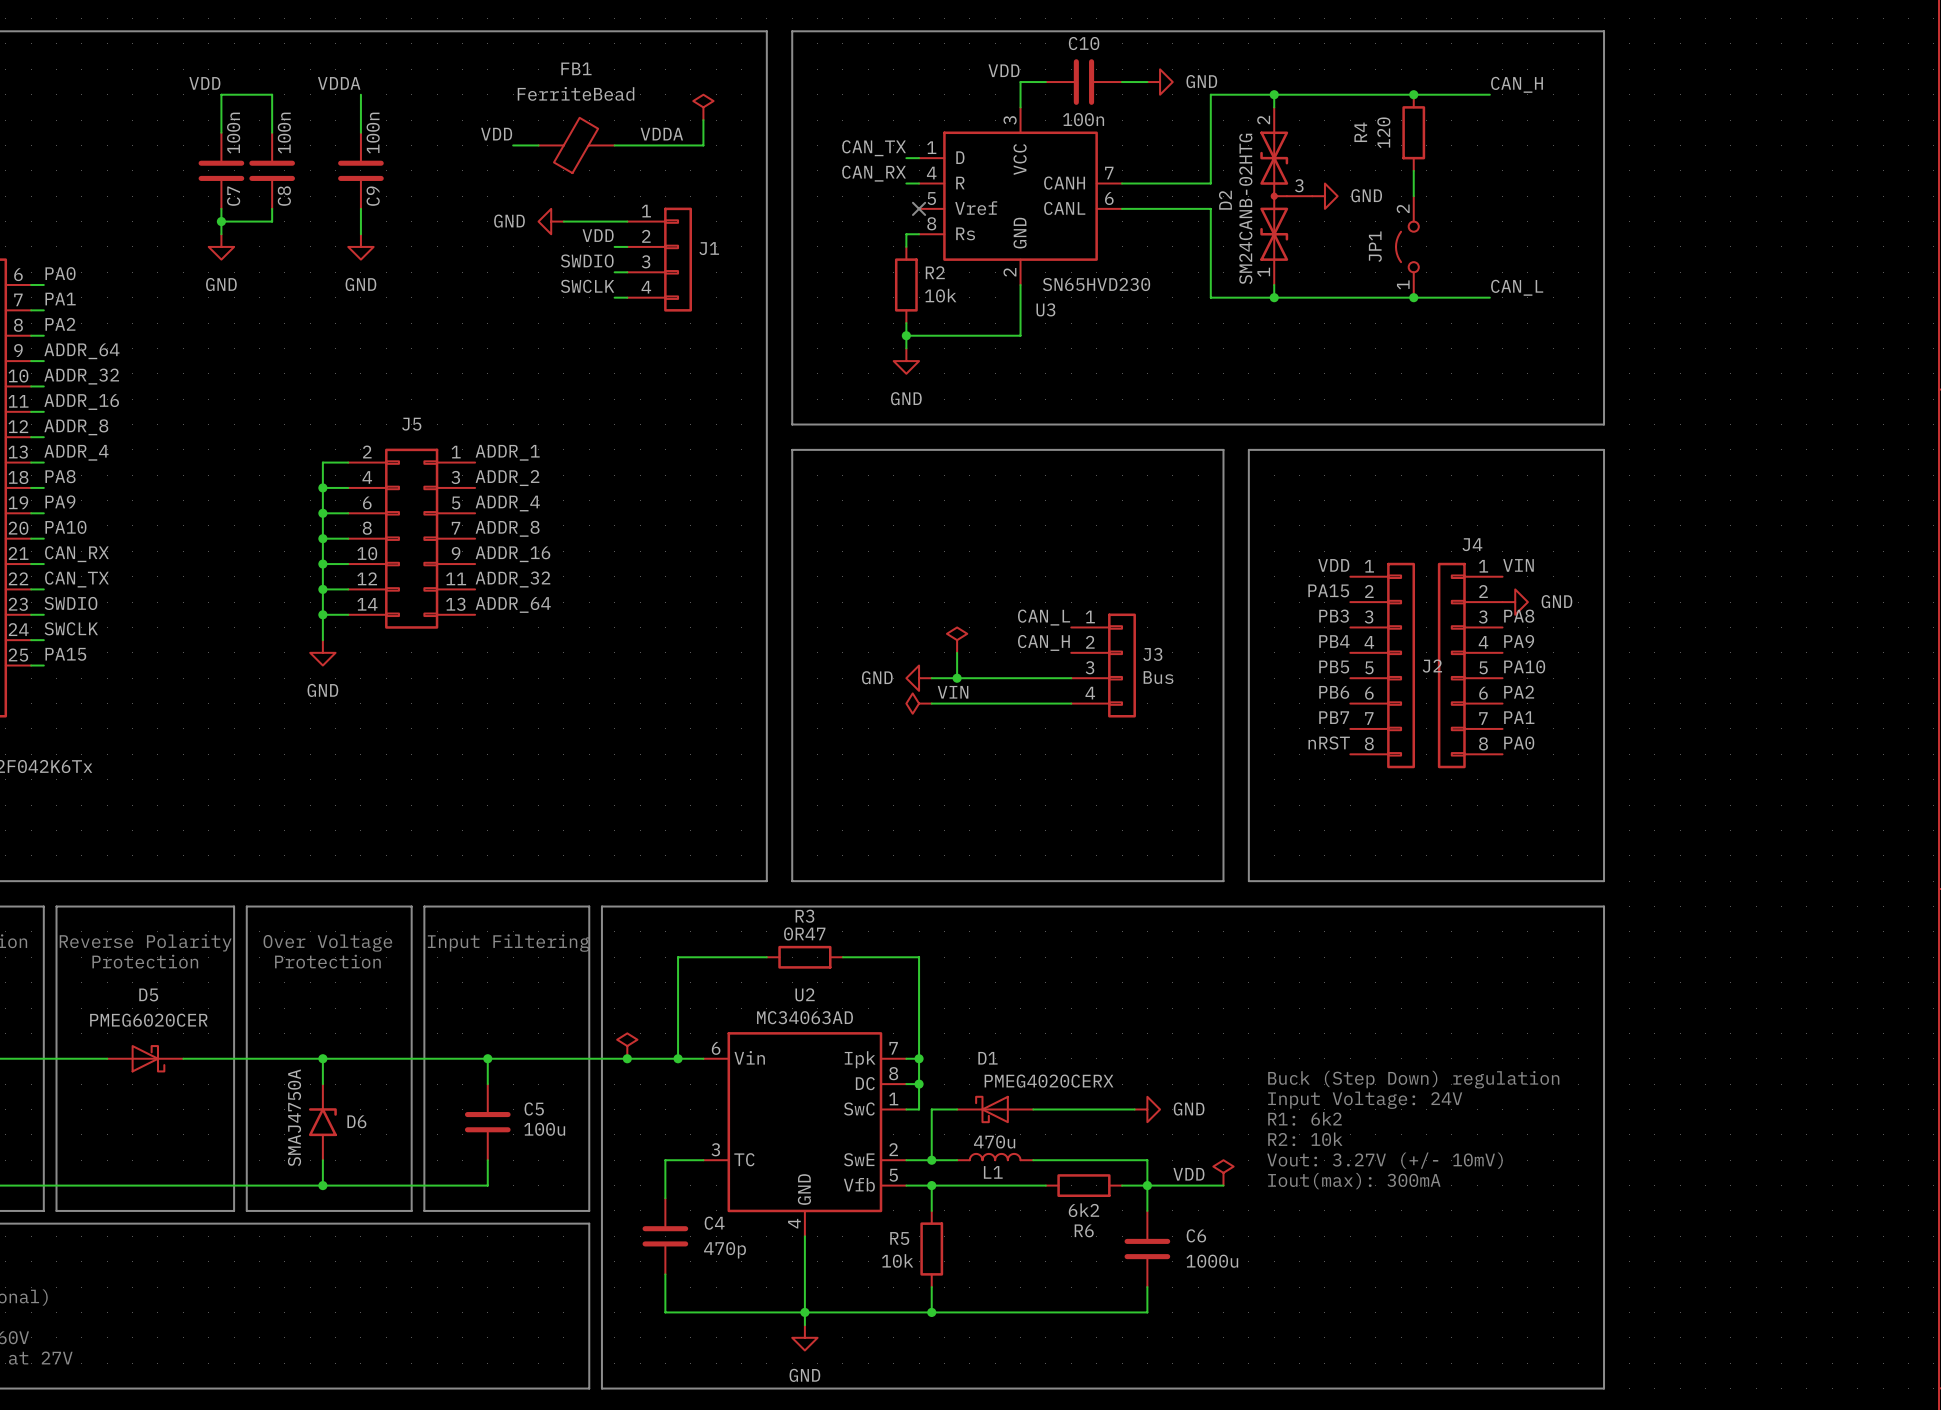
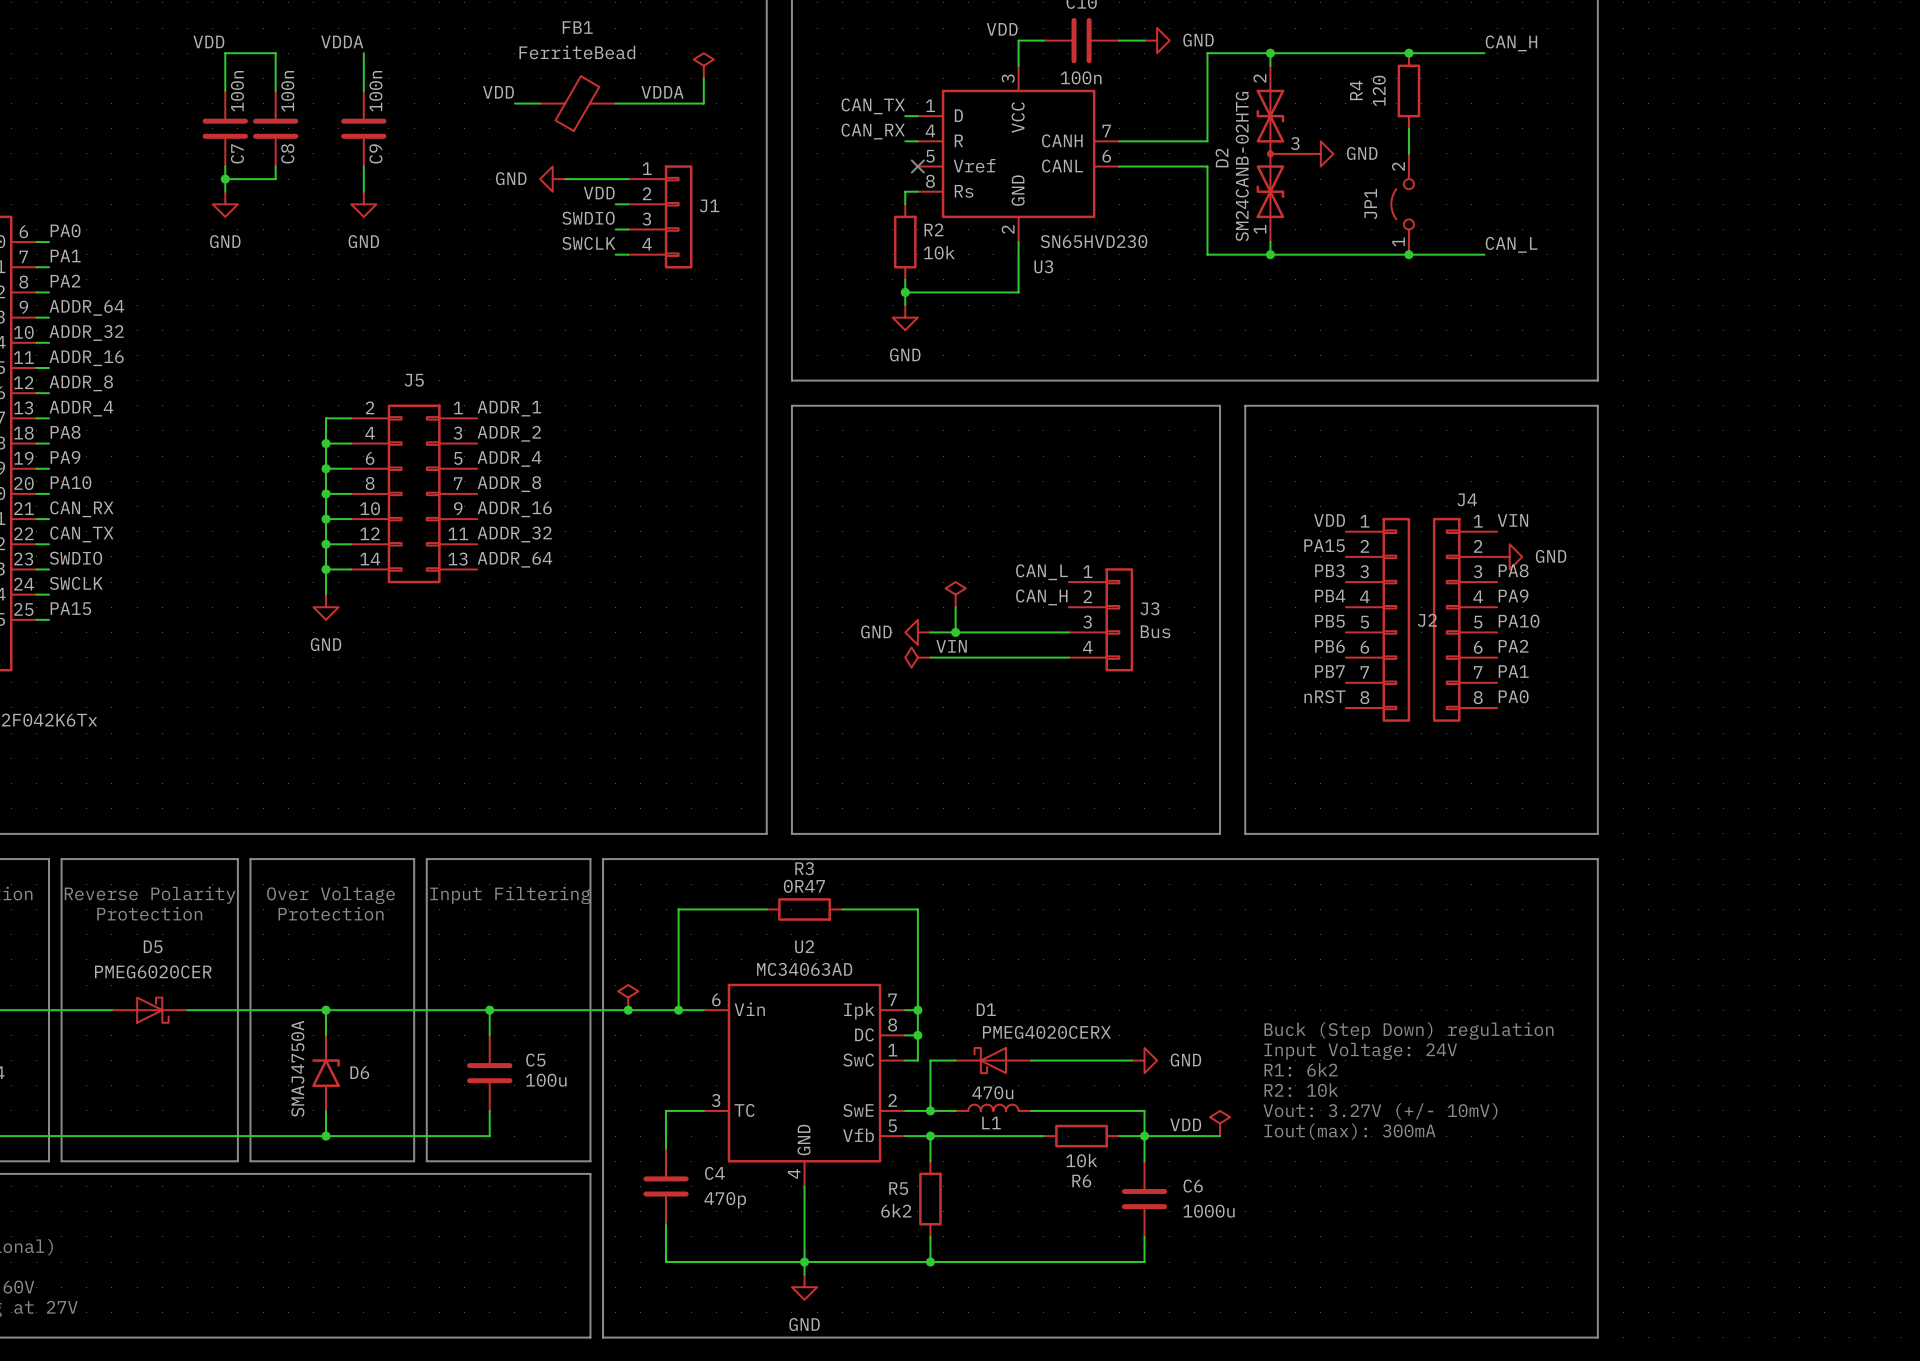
R6 value: 6k2 (1083, 1210) -> 10k (1081, 1160)
R5 value: 10k (897, 1260) -> 6k2 (896, 1210)

